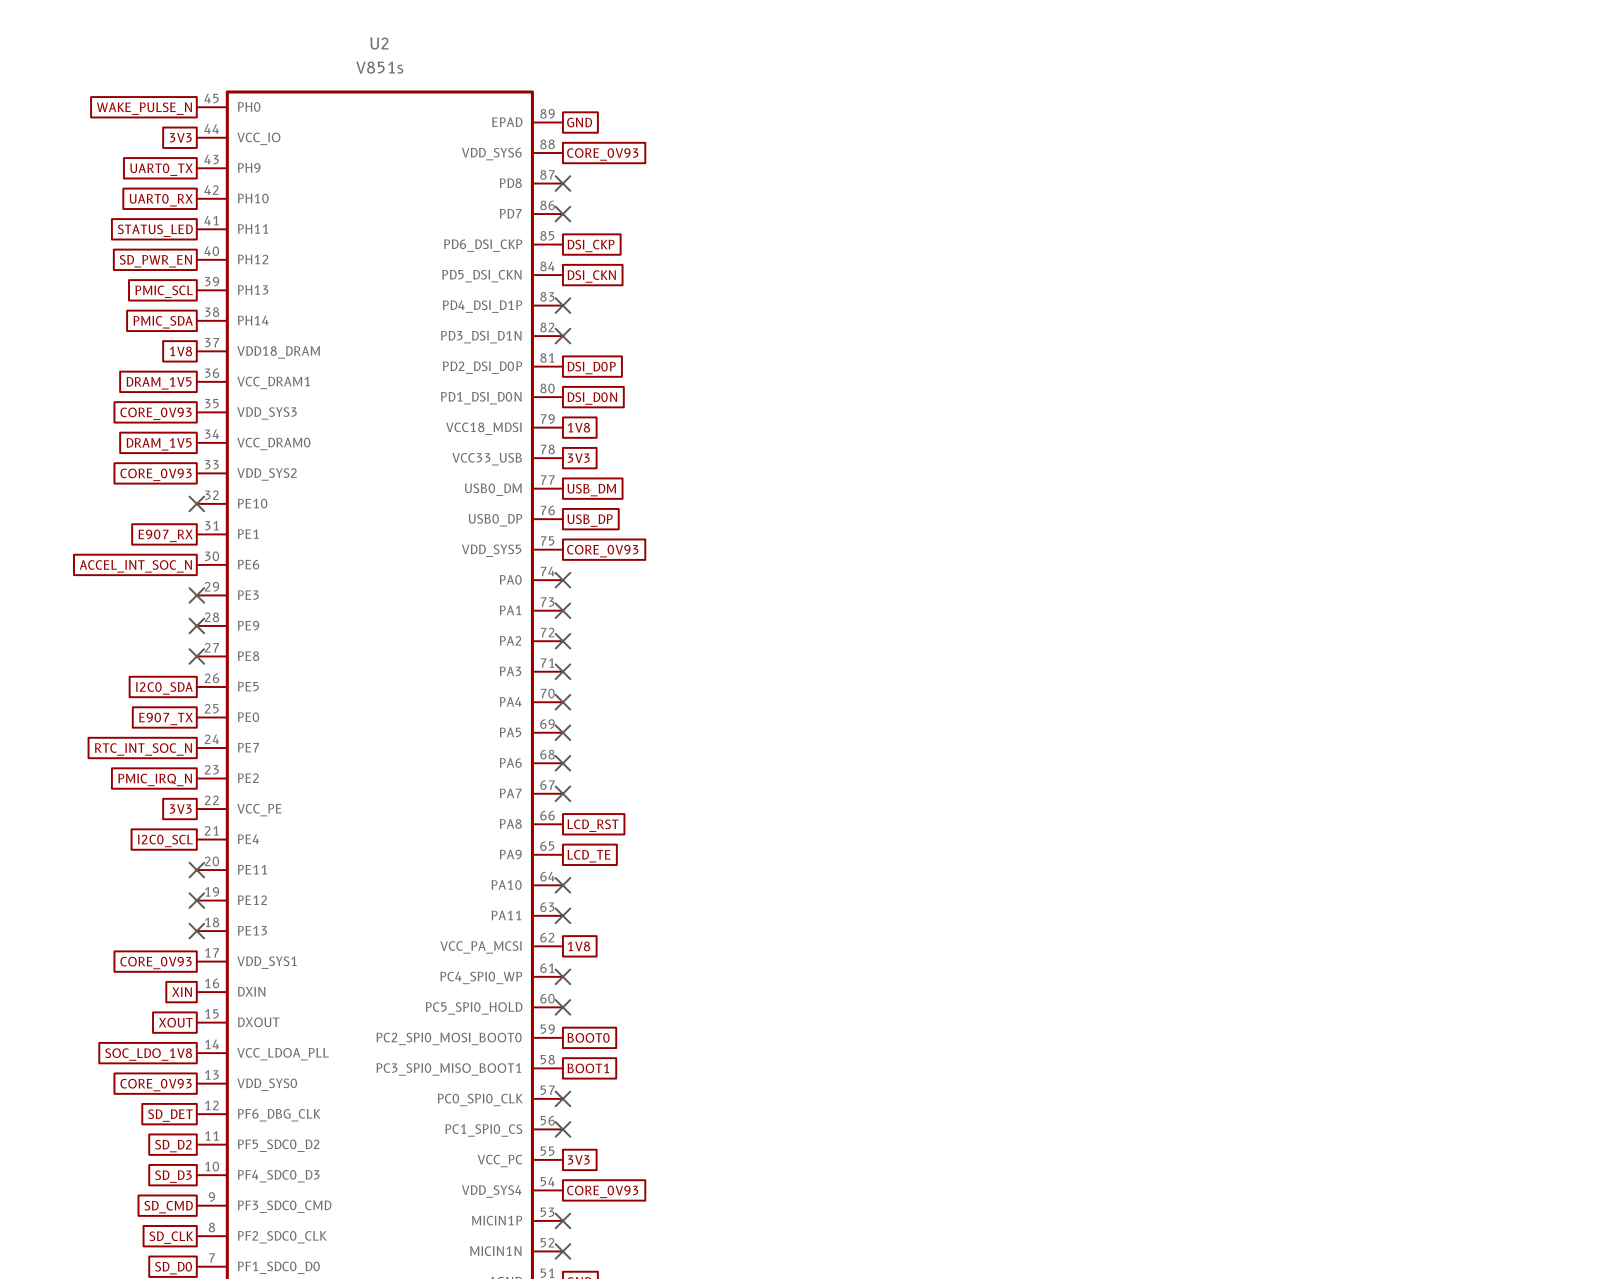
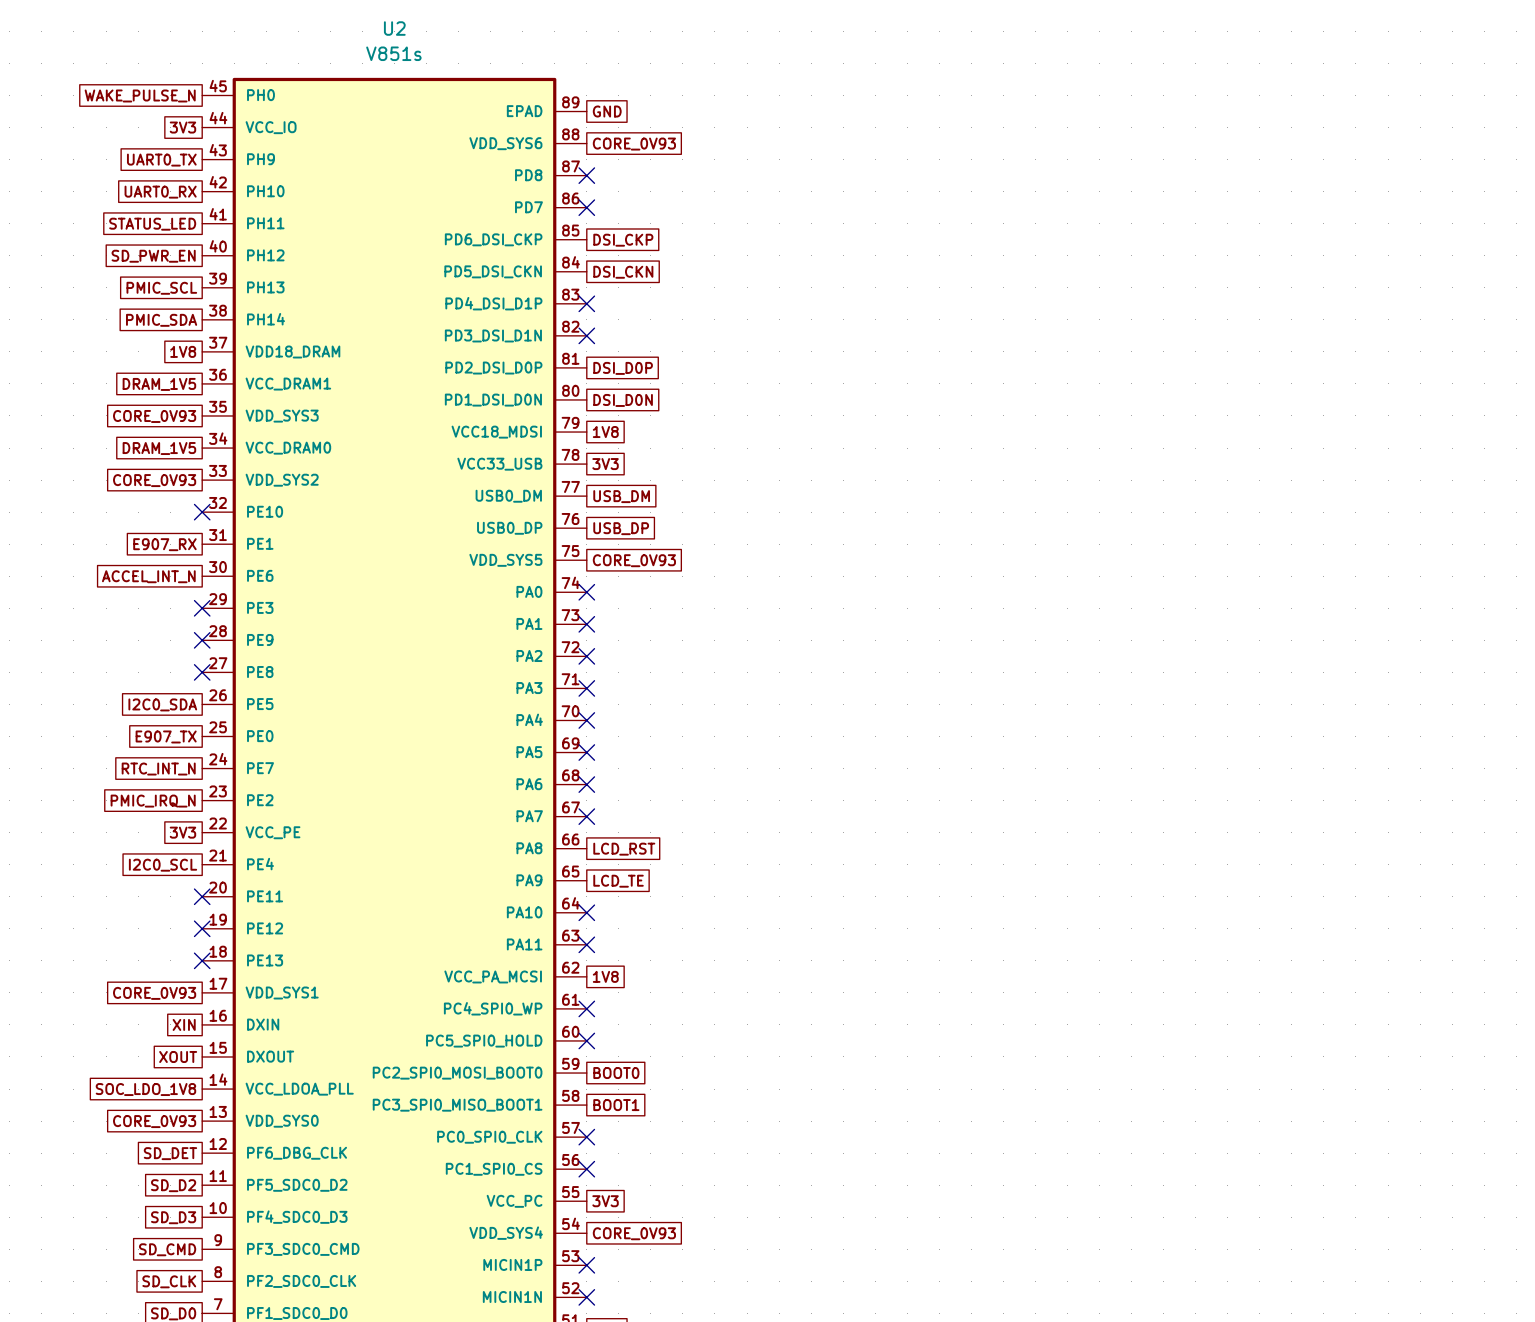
global label: ACCEL_INT_SOC_N (135, 566) -> ACCEL_INT_N (148, 576)
global label: RTC_INT_SOC_N (143, 749) -> RTC_INT_N (158, 769)

